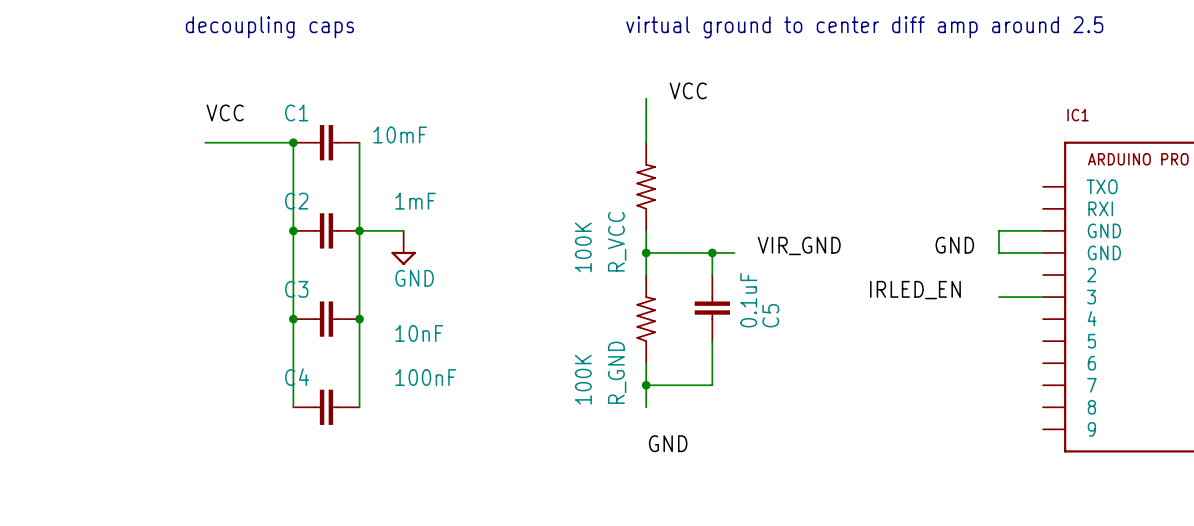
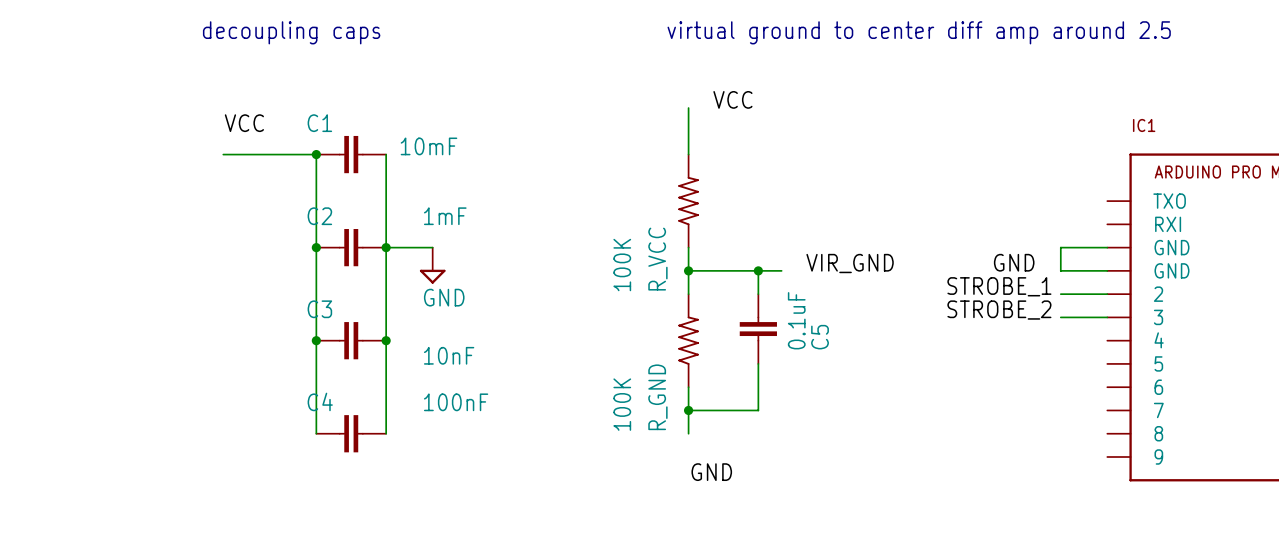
label: none -> STROBE_1 (999, 286)
wire: none -> (1060, 294) (1107, 294)
label: IRLED_EN (915, 290) -> none
label: none -> STROBE_2 (999, 310)

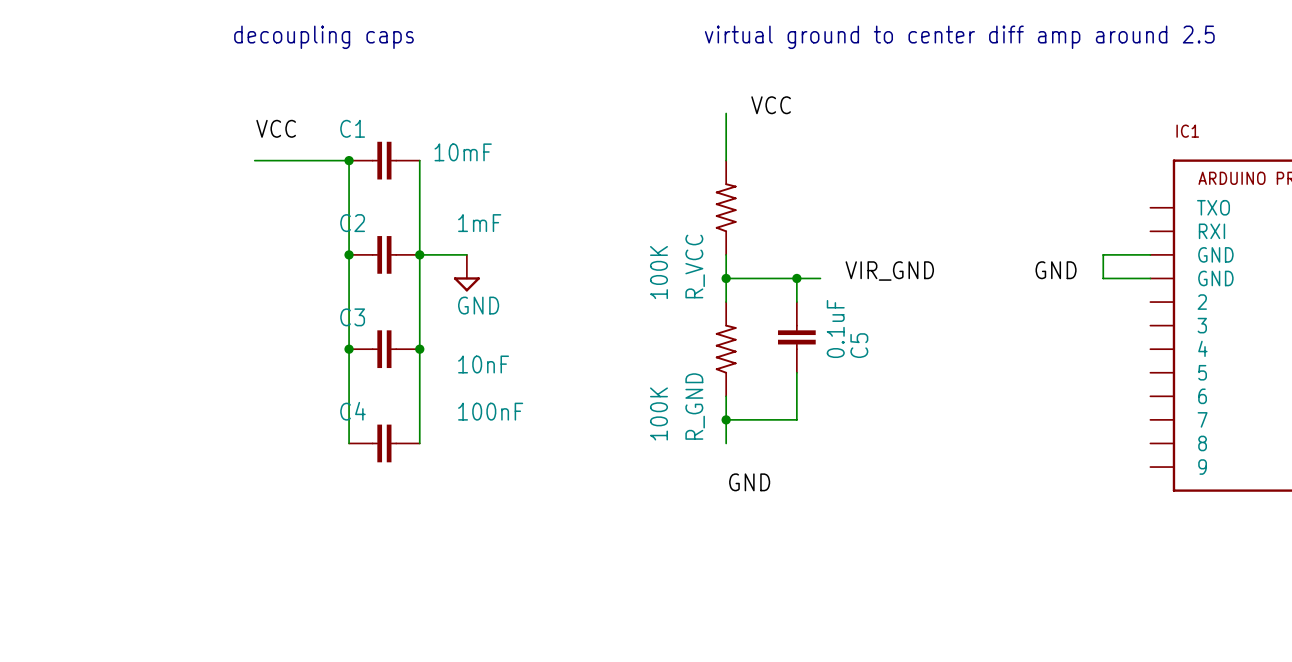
label: STROBE_1 (999, 286) -> none
wire: (1060, 294) (1107, 294) -> none
label: STROBE_2 (999, 310) -> none
wire: (1060, 317) (1107, 317) -> none

